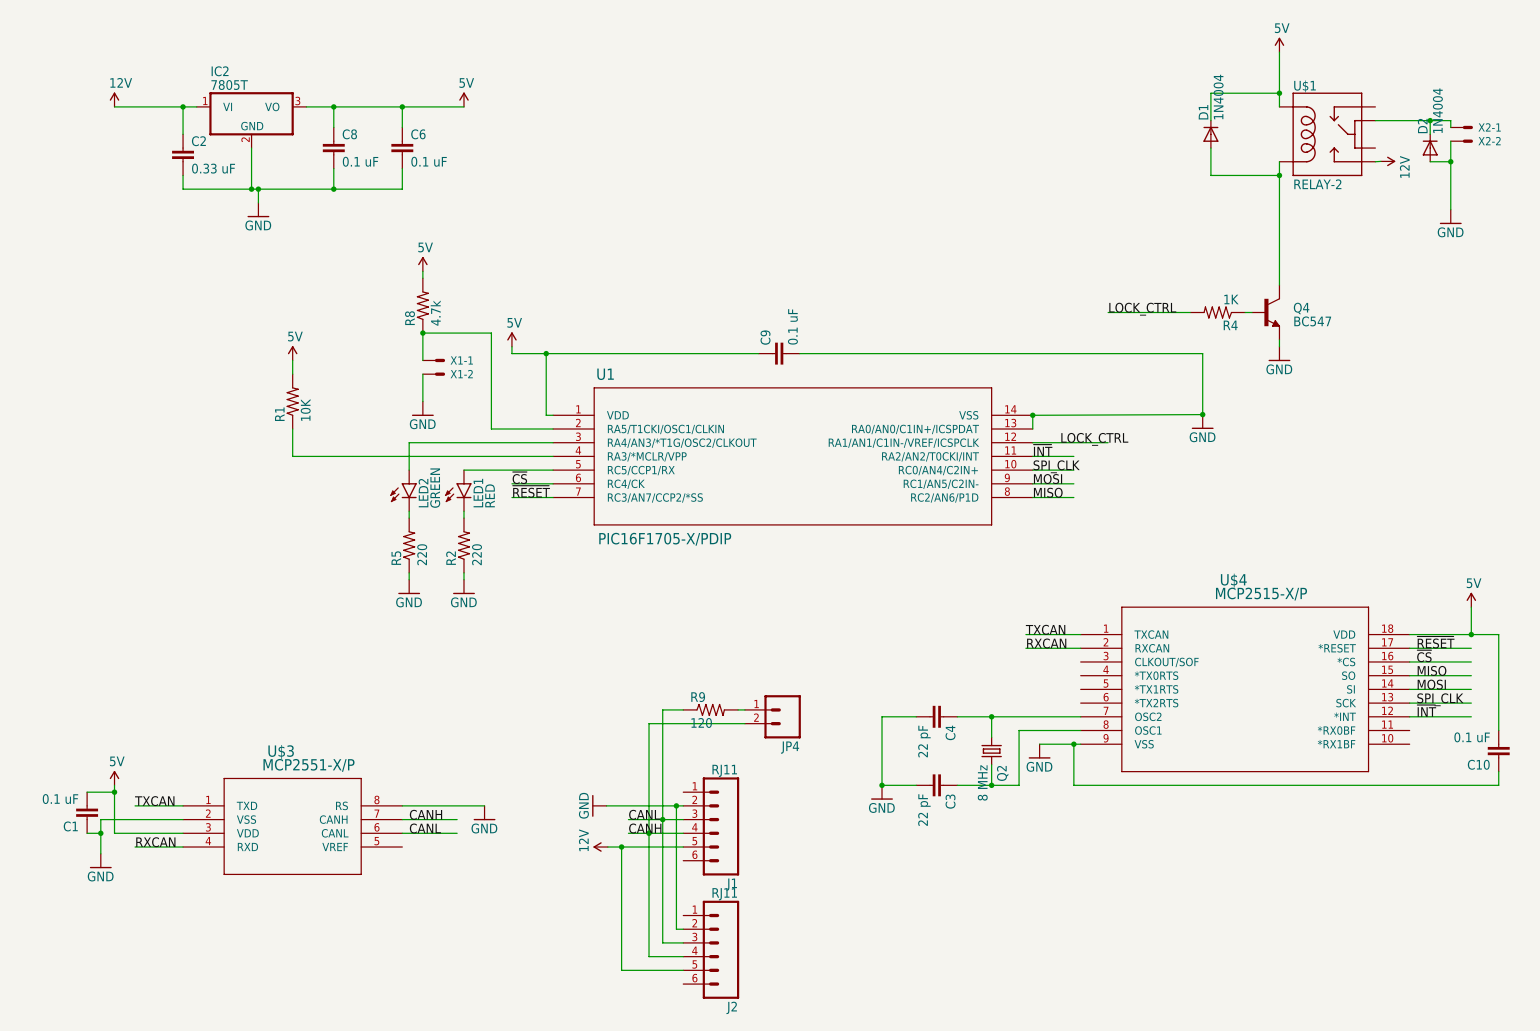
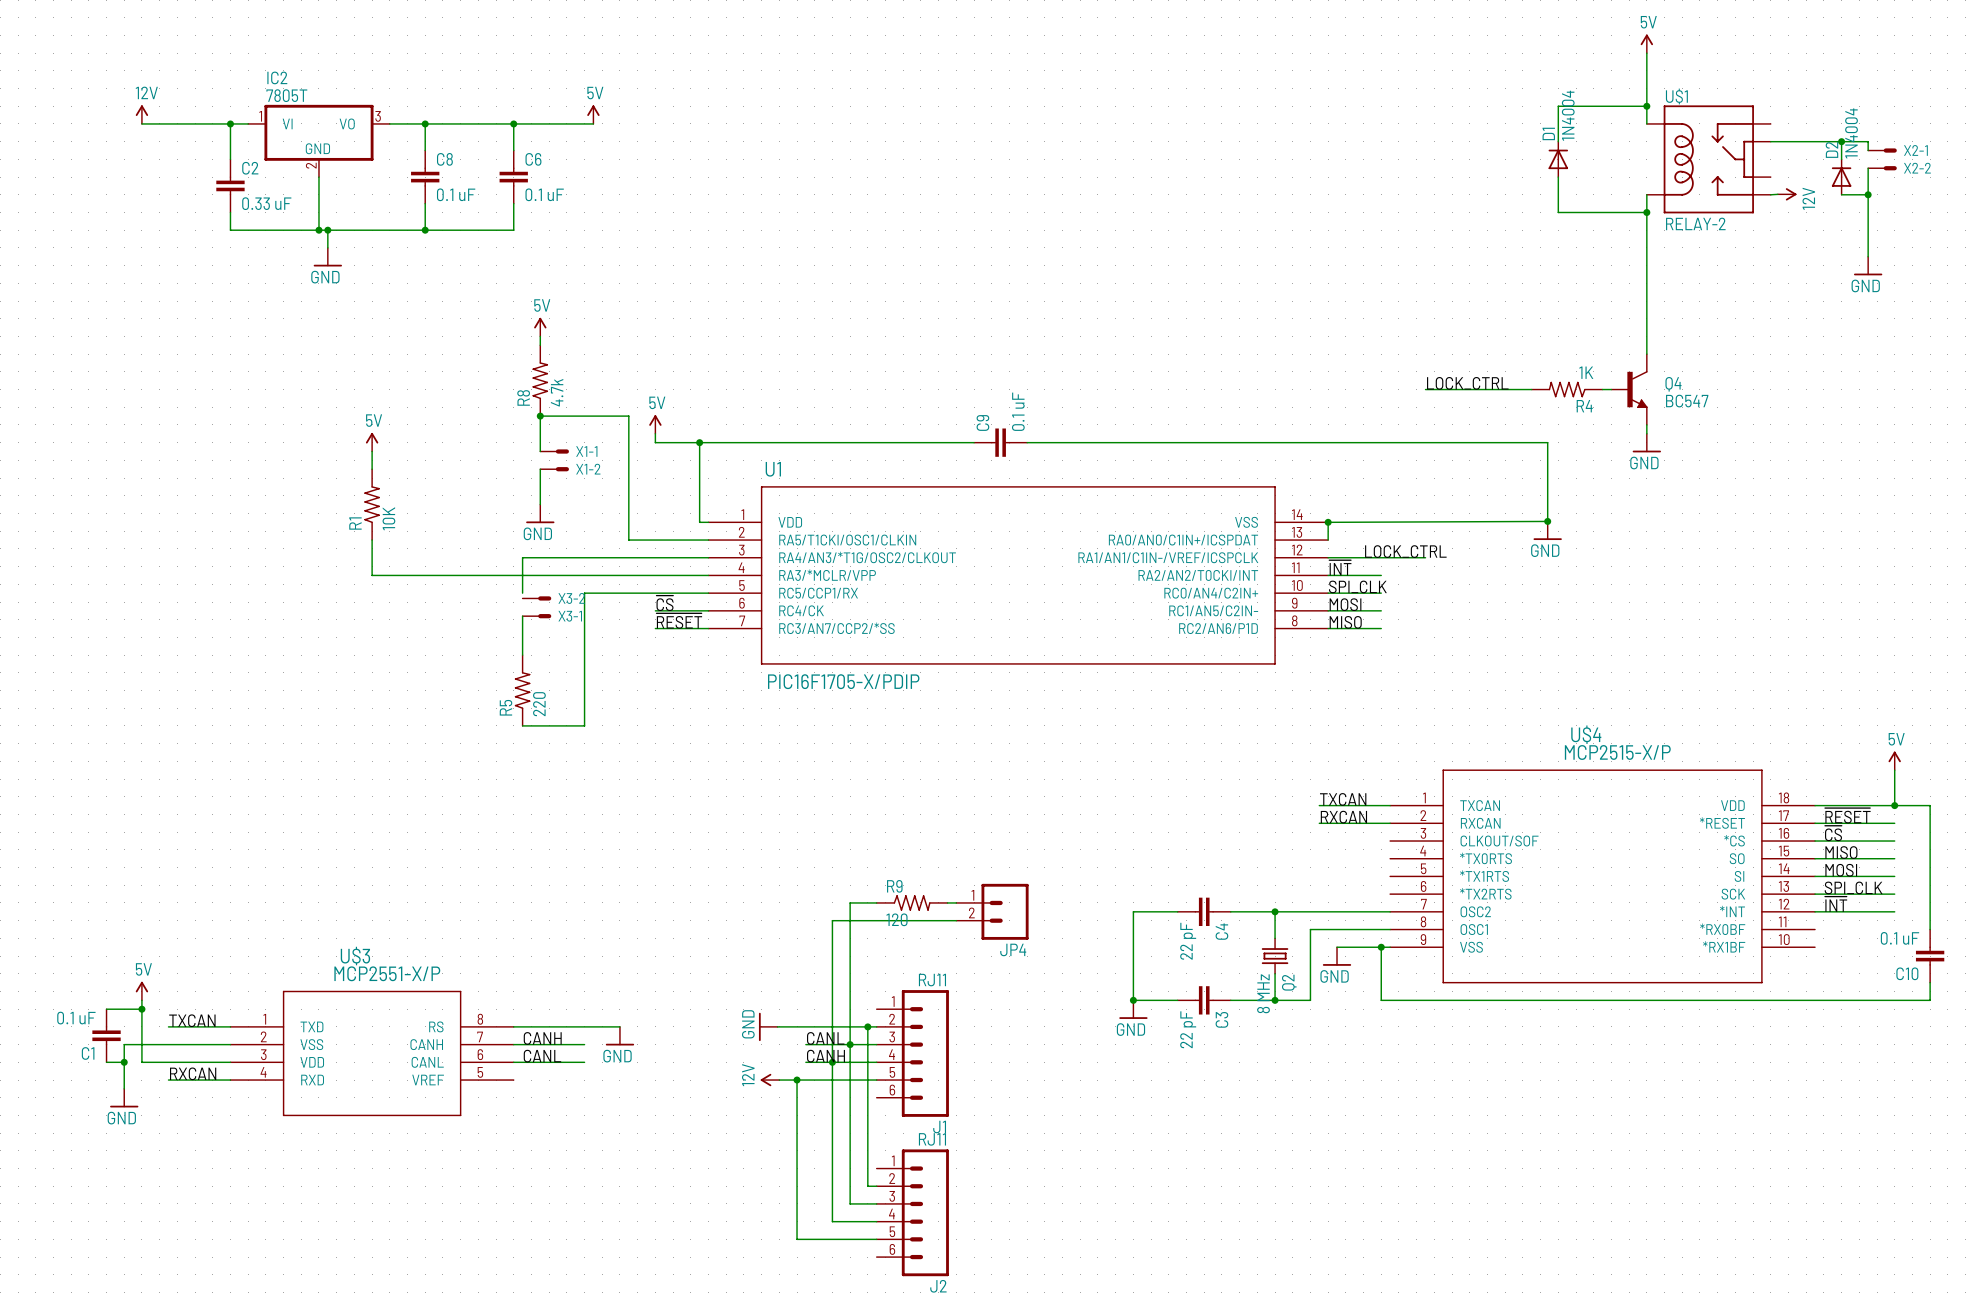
X3-2: none -> (536, 598)
X3-1: none -> (536, 616)
LED2: GREEN (403, 490) -> none
LED1: RED (458, 490) -> none
wire: (463, 511) (463, 518) -> none
R2: 220 (463, 545) -> none
wire: (409, 572) (409, 579) -> (522, 725) (584, 725) (584, 593) (593, 593)
wire: (463, 572) (463, 579) -> none
power symbol: GND (409, 586) -> none
power symbol: GND (463, 586) -> none

